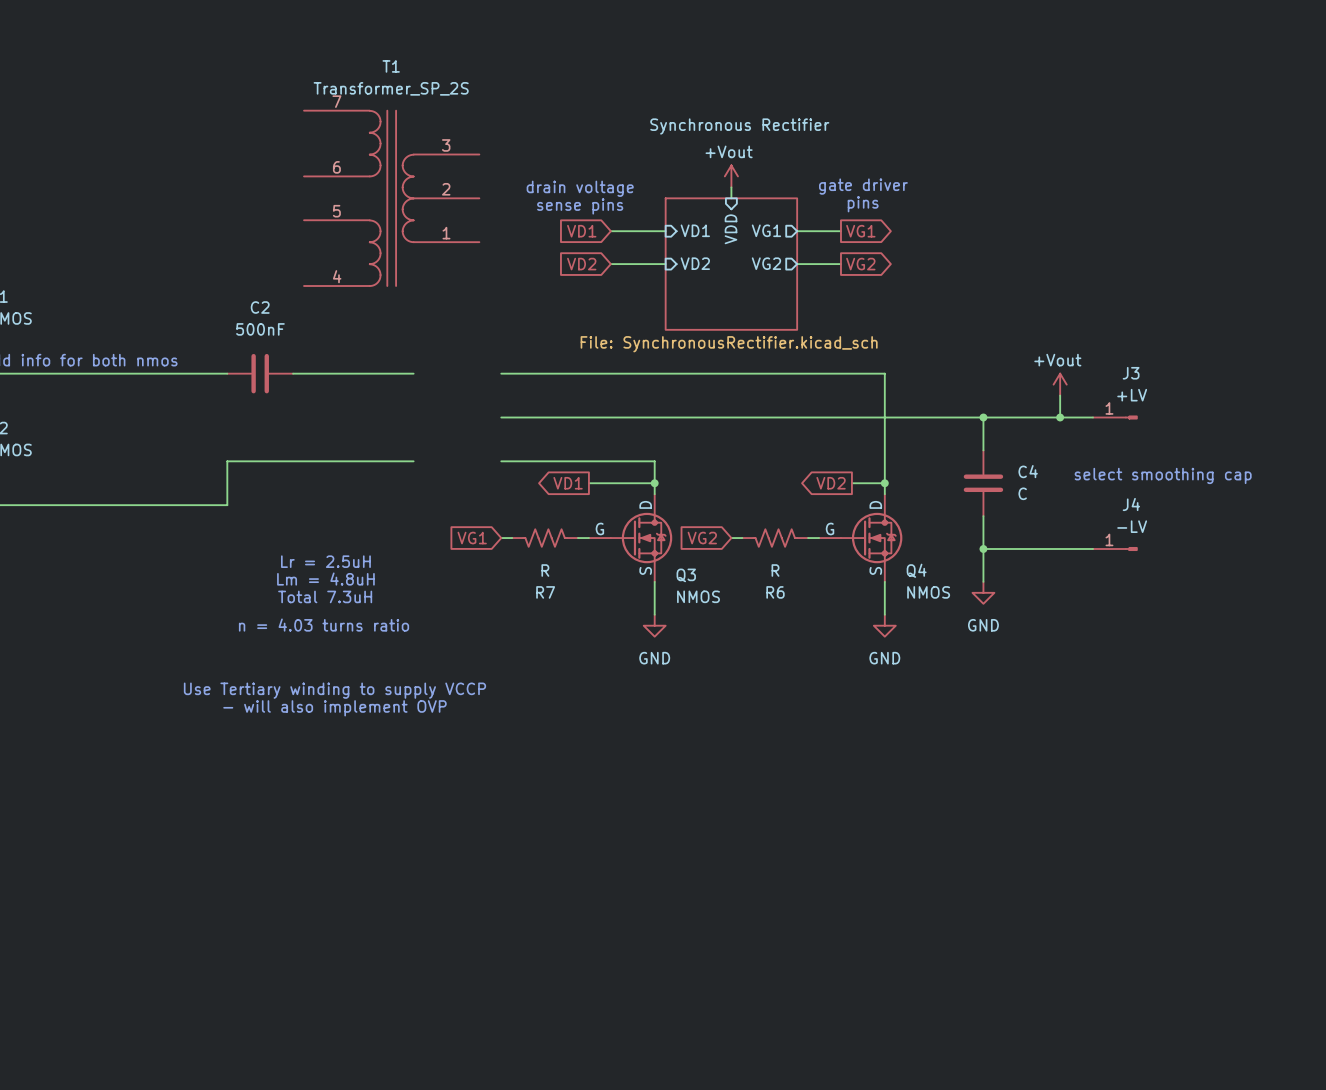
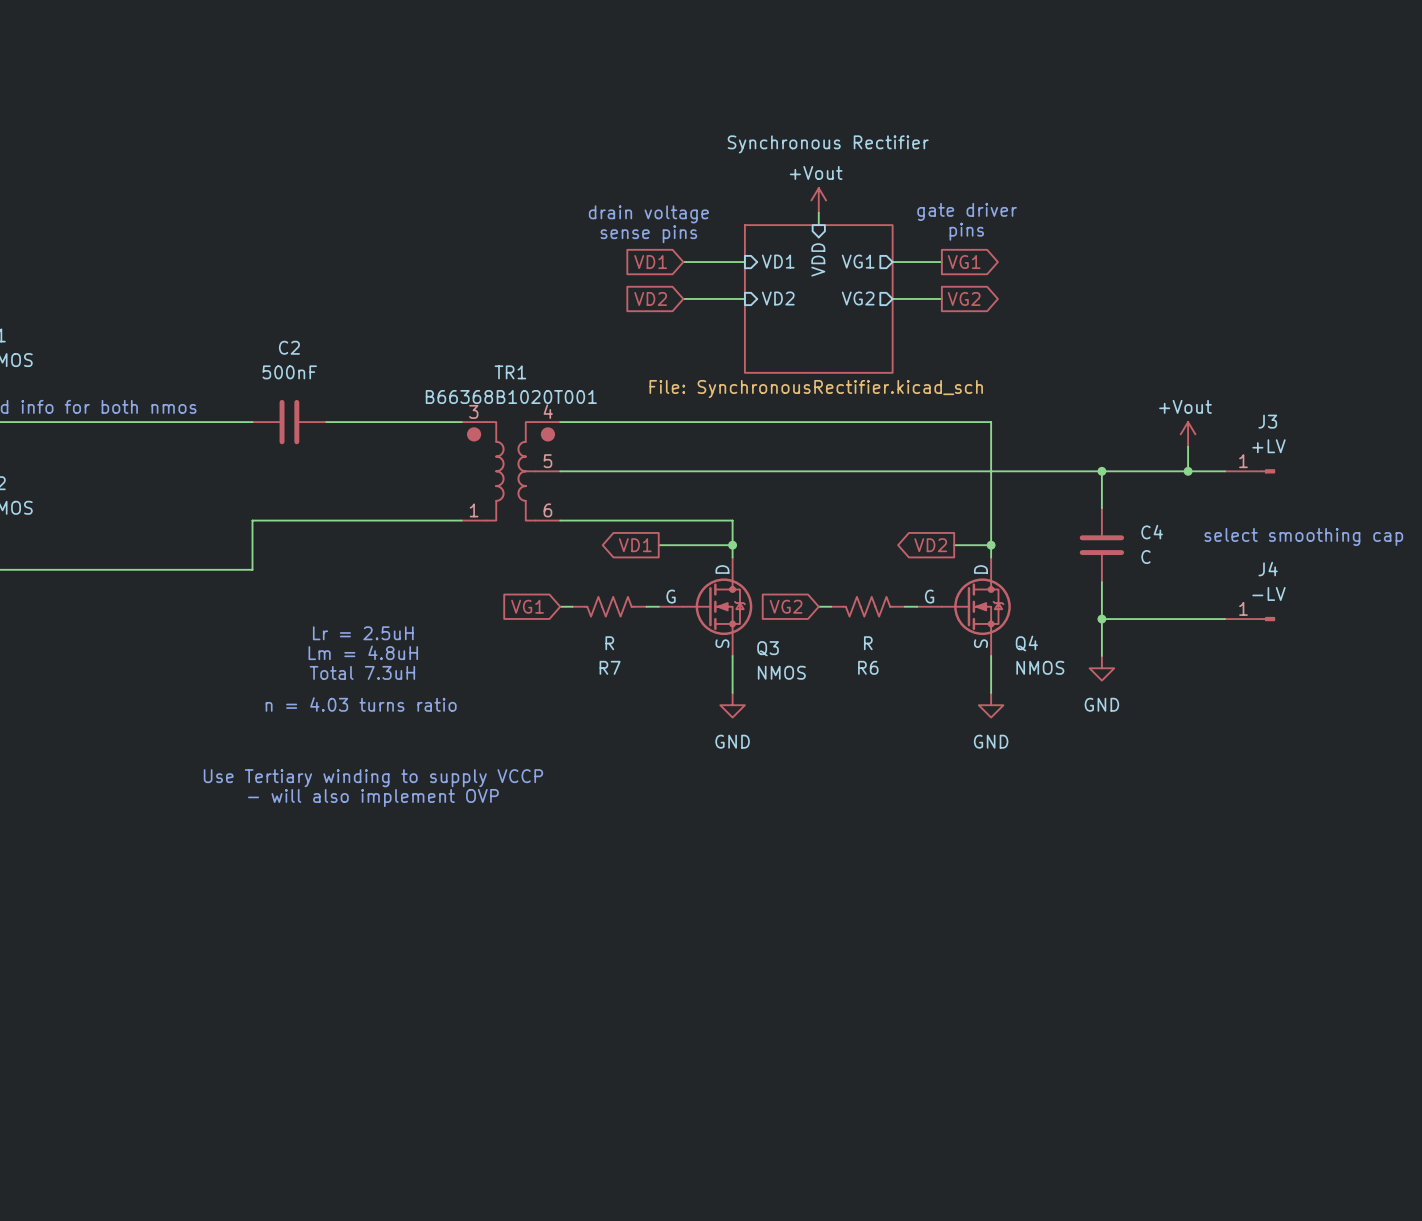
T1: Transformer_SP_2S (391, 198) -> none
TR1: none -> B66368B1020T001 (511, 471)

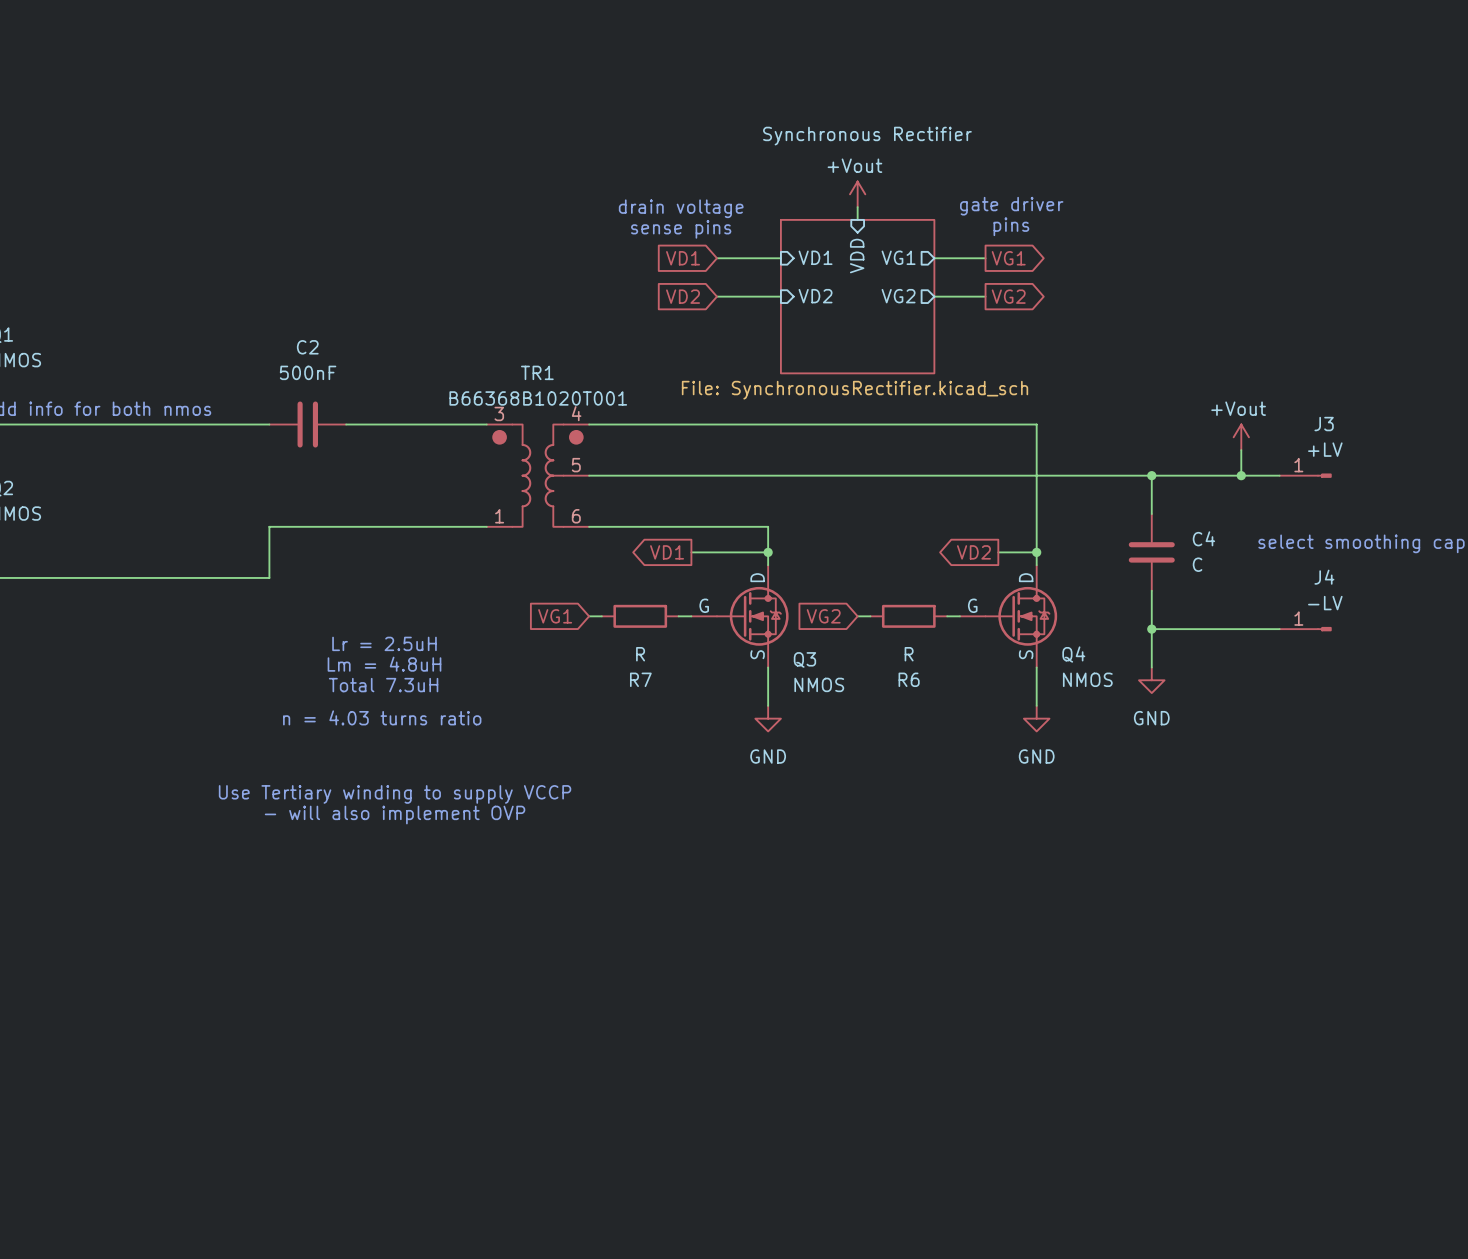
R7 symbol: [572, 596, 647, 617] -> [601, 604, 679, 628]
R6 symbol: [831, 596, 905, 617] -> [870, 604, 948, 628]

